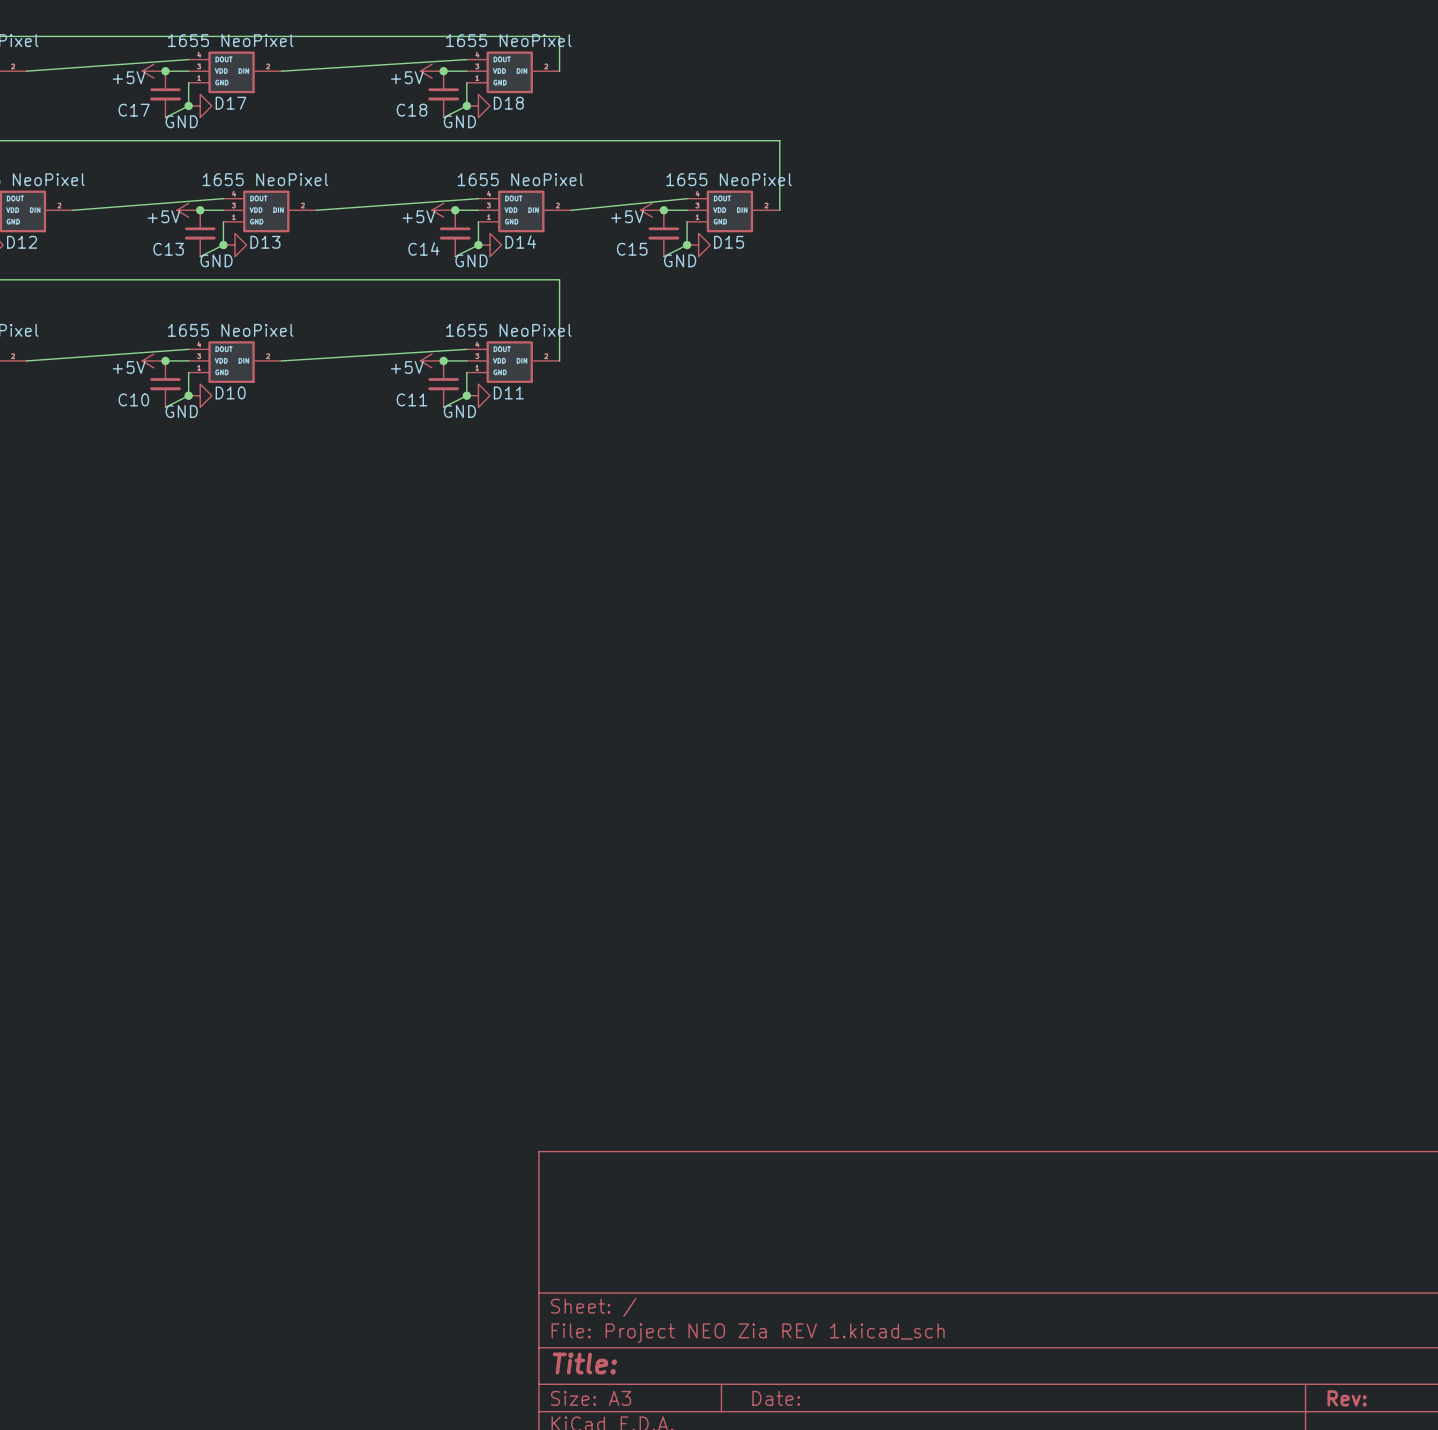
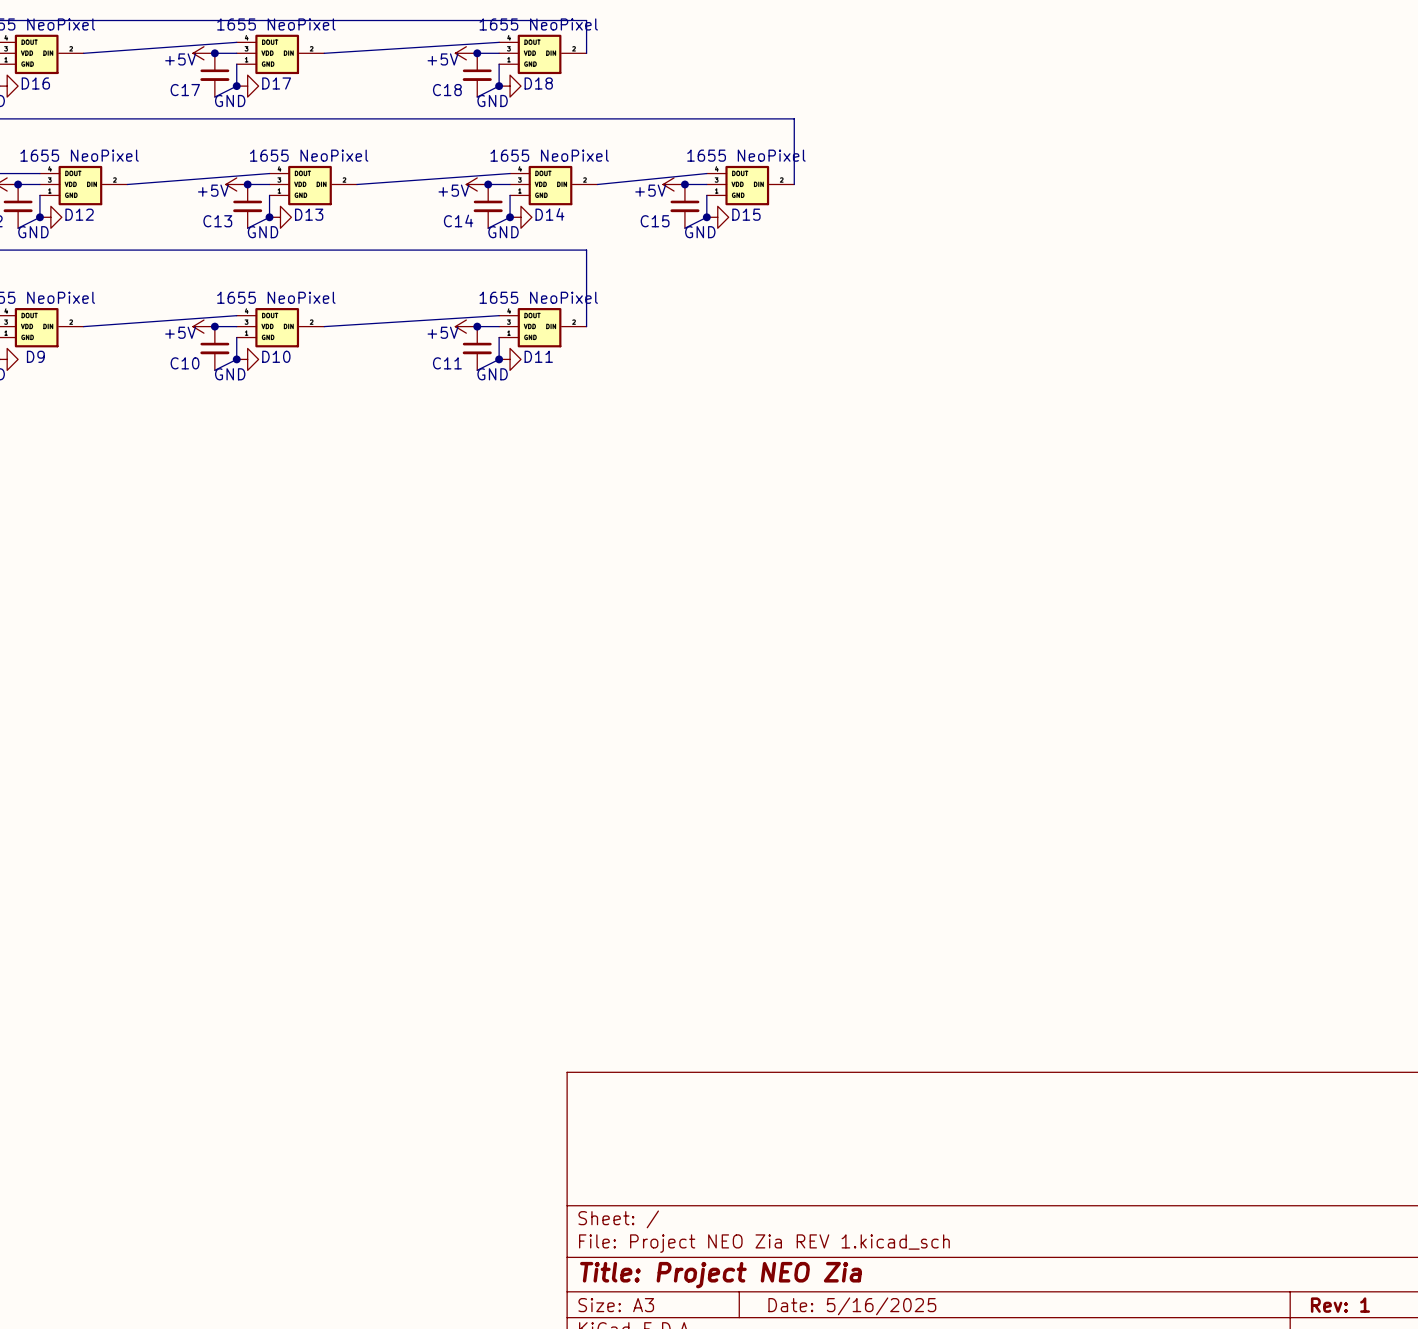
title block: Title: (584, 1363) -> Title: Project NEO Zia (721, 1275)
title block: Date: (776, 1398) -> Date: 5/16/2025 (852, 1306)
title block: Rev: (1347, 1398) -> Rev: 1 (1340, 1305)

